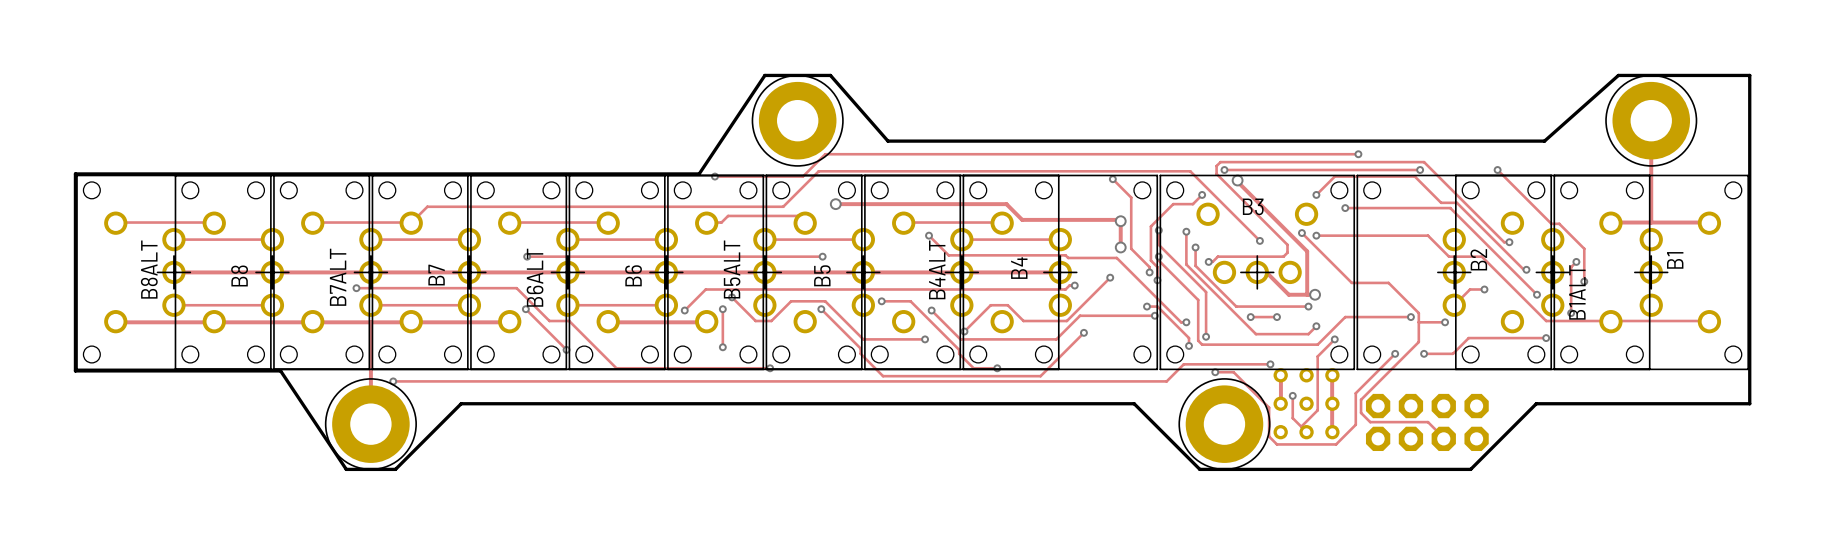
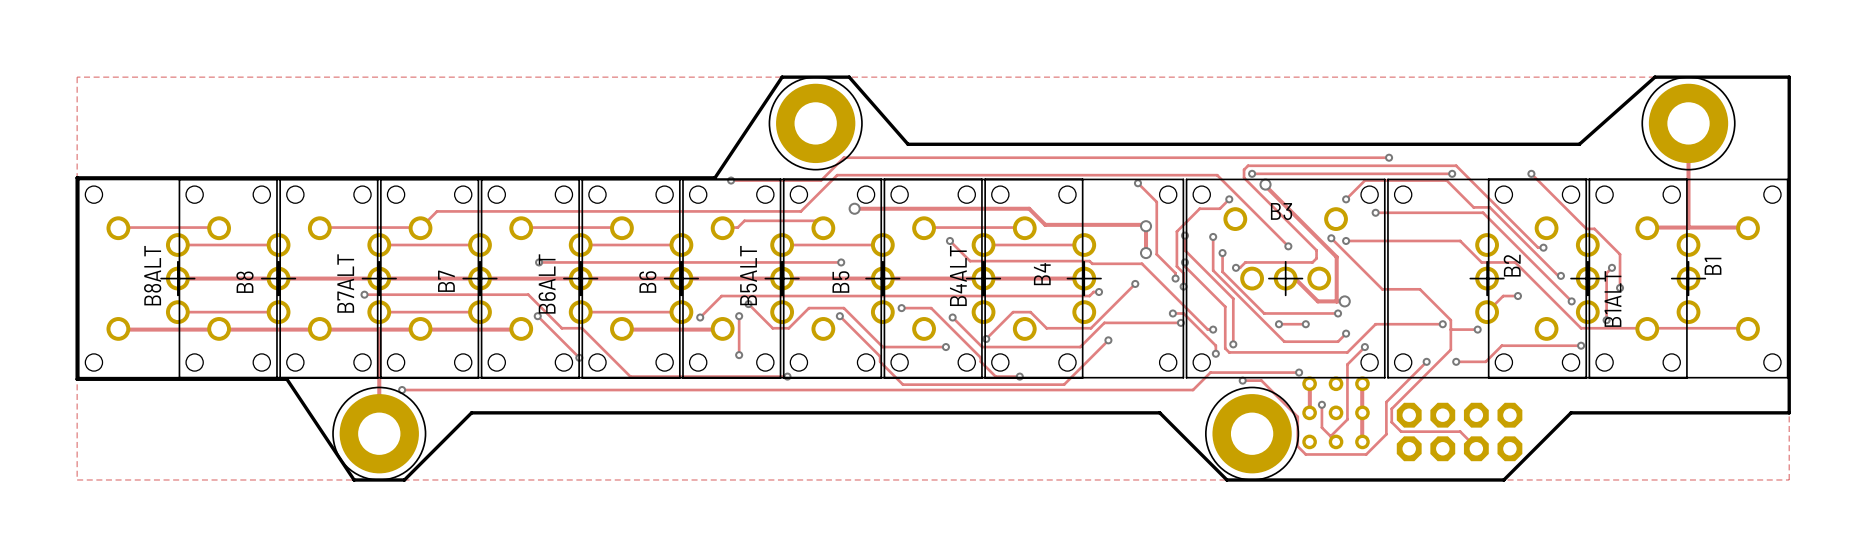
zone outline: none -> (77, 77) (1789, 77) (1789, 479) (77, 479) (77, 77)

